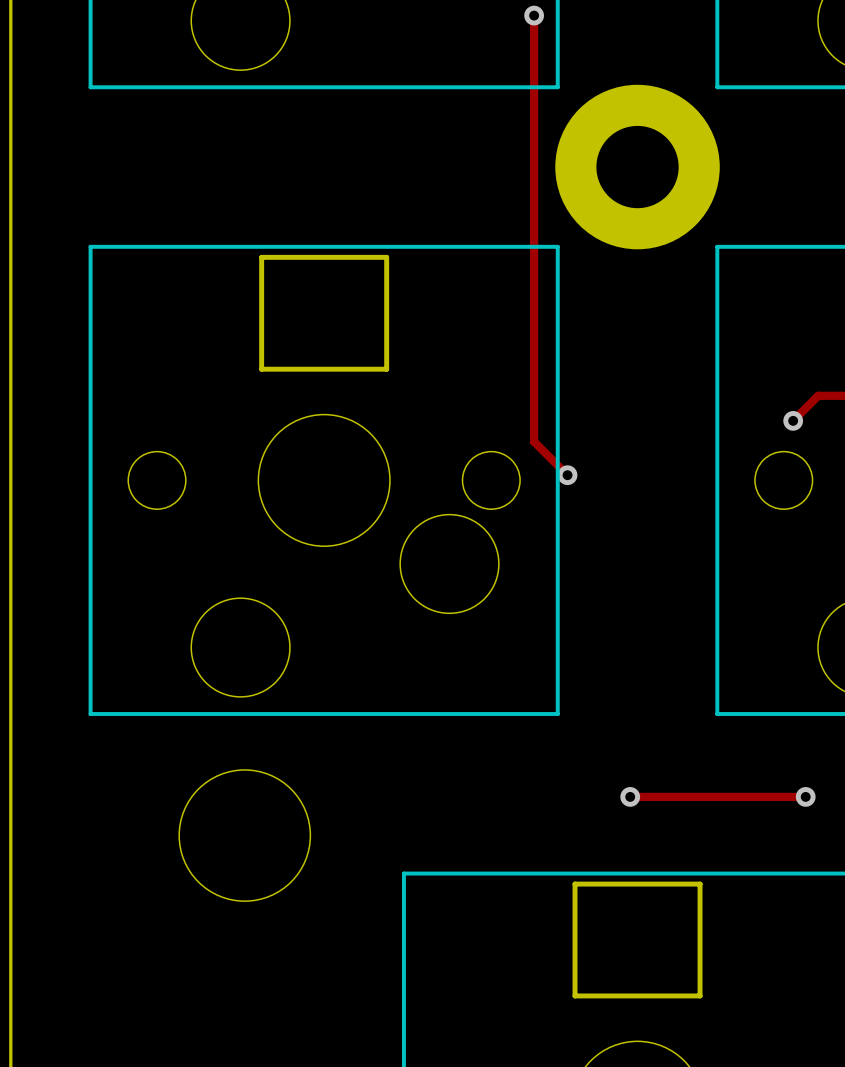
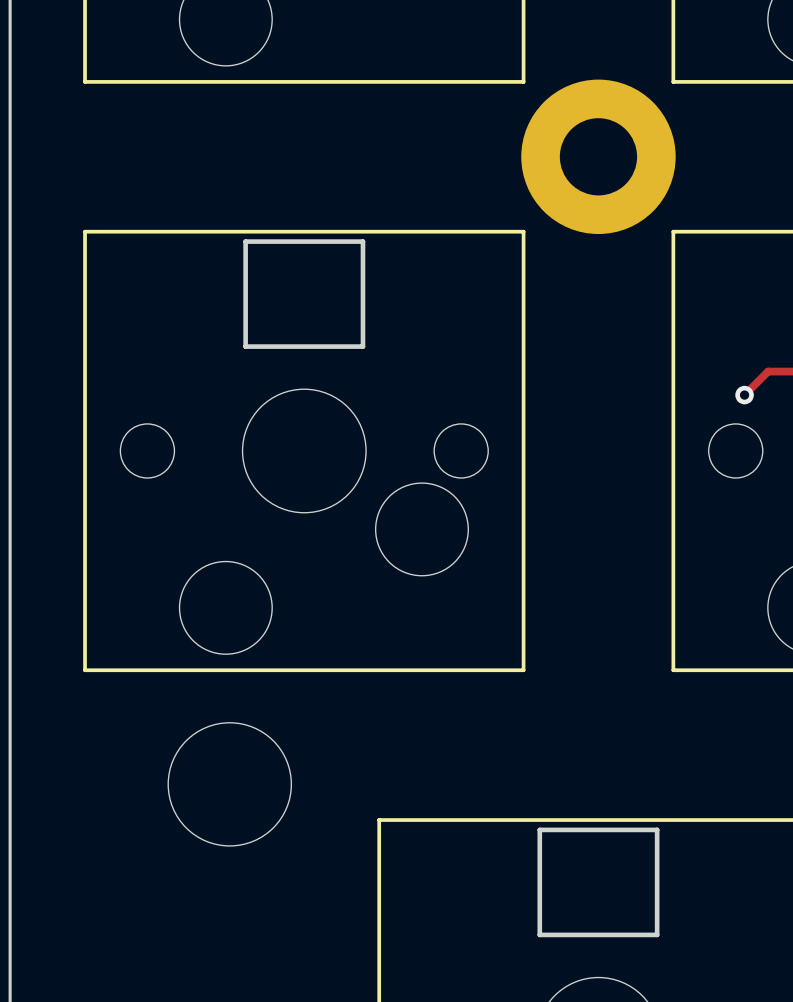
track: (534, 15) (534, 441) (567, 475) -> none
via: (534, 15) -> none
via: (567, 475) -> none
track: (630, 796) (805, 796) -> none
via: (630, 796) -> none
via: (805, 796) -> none

